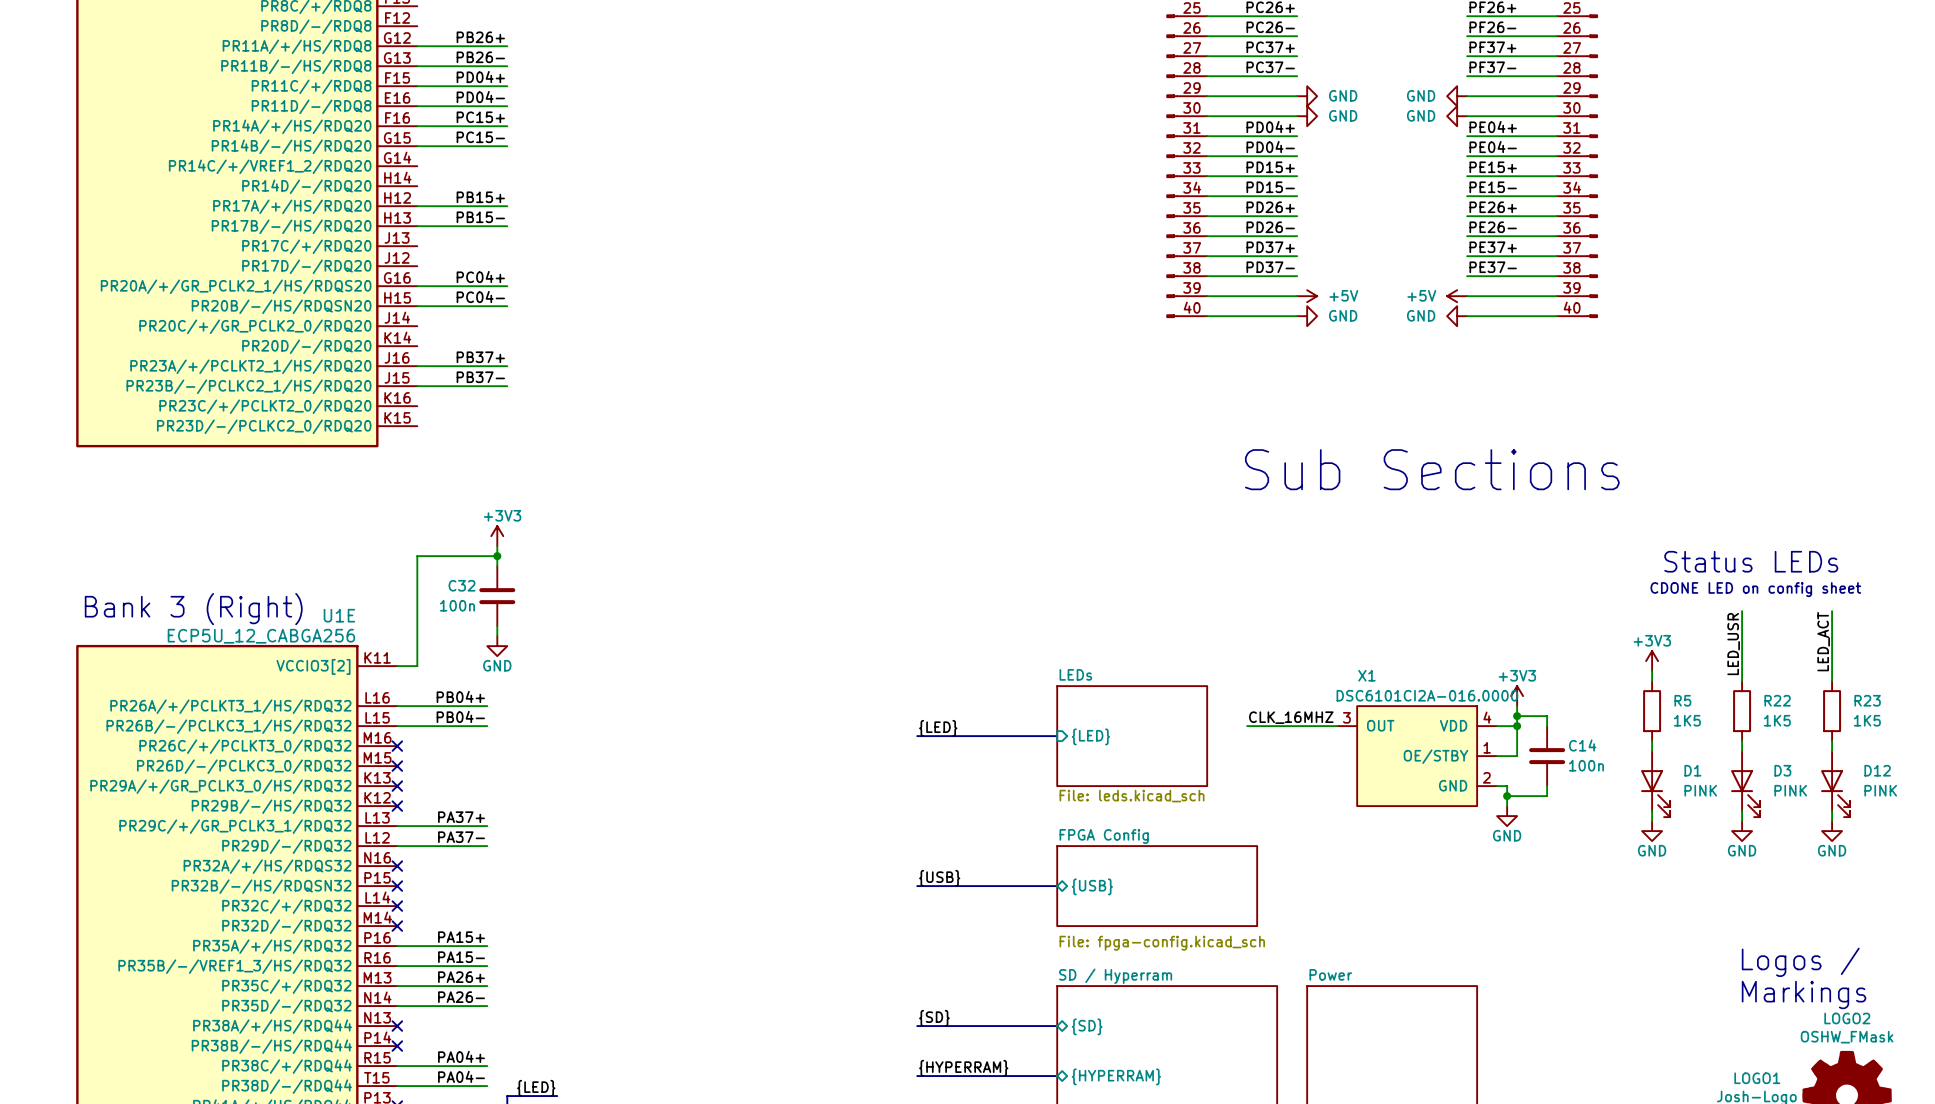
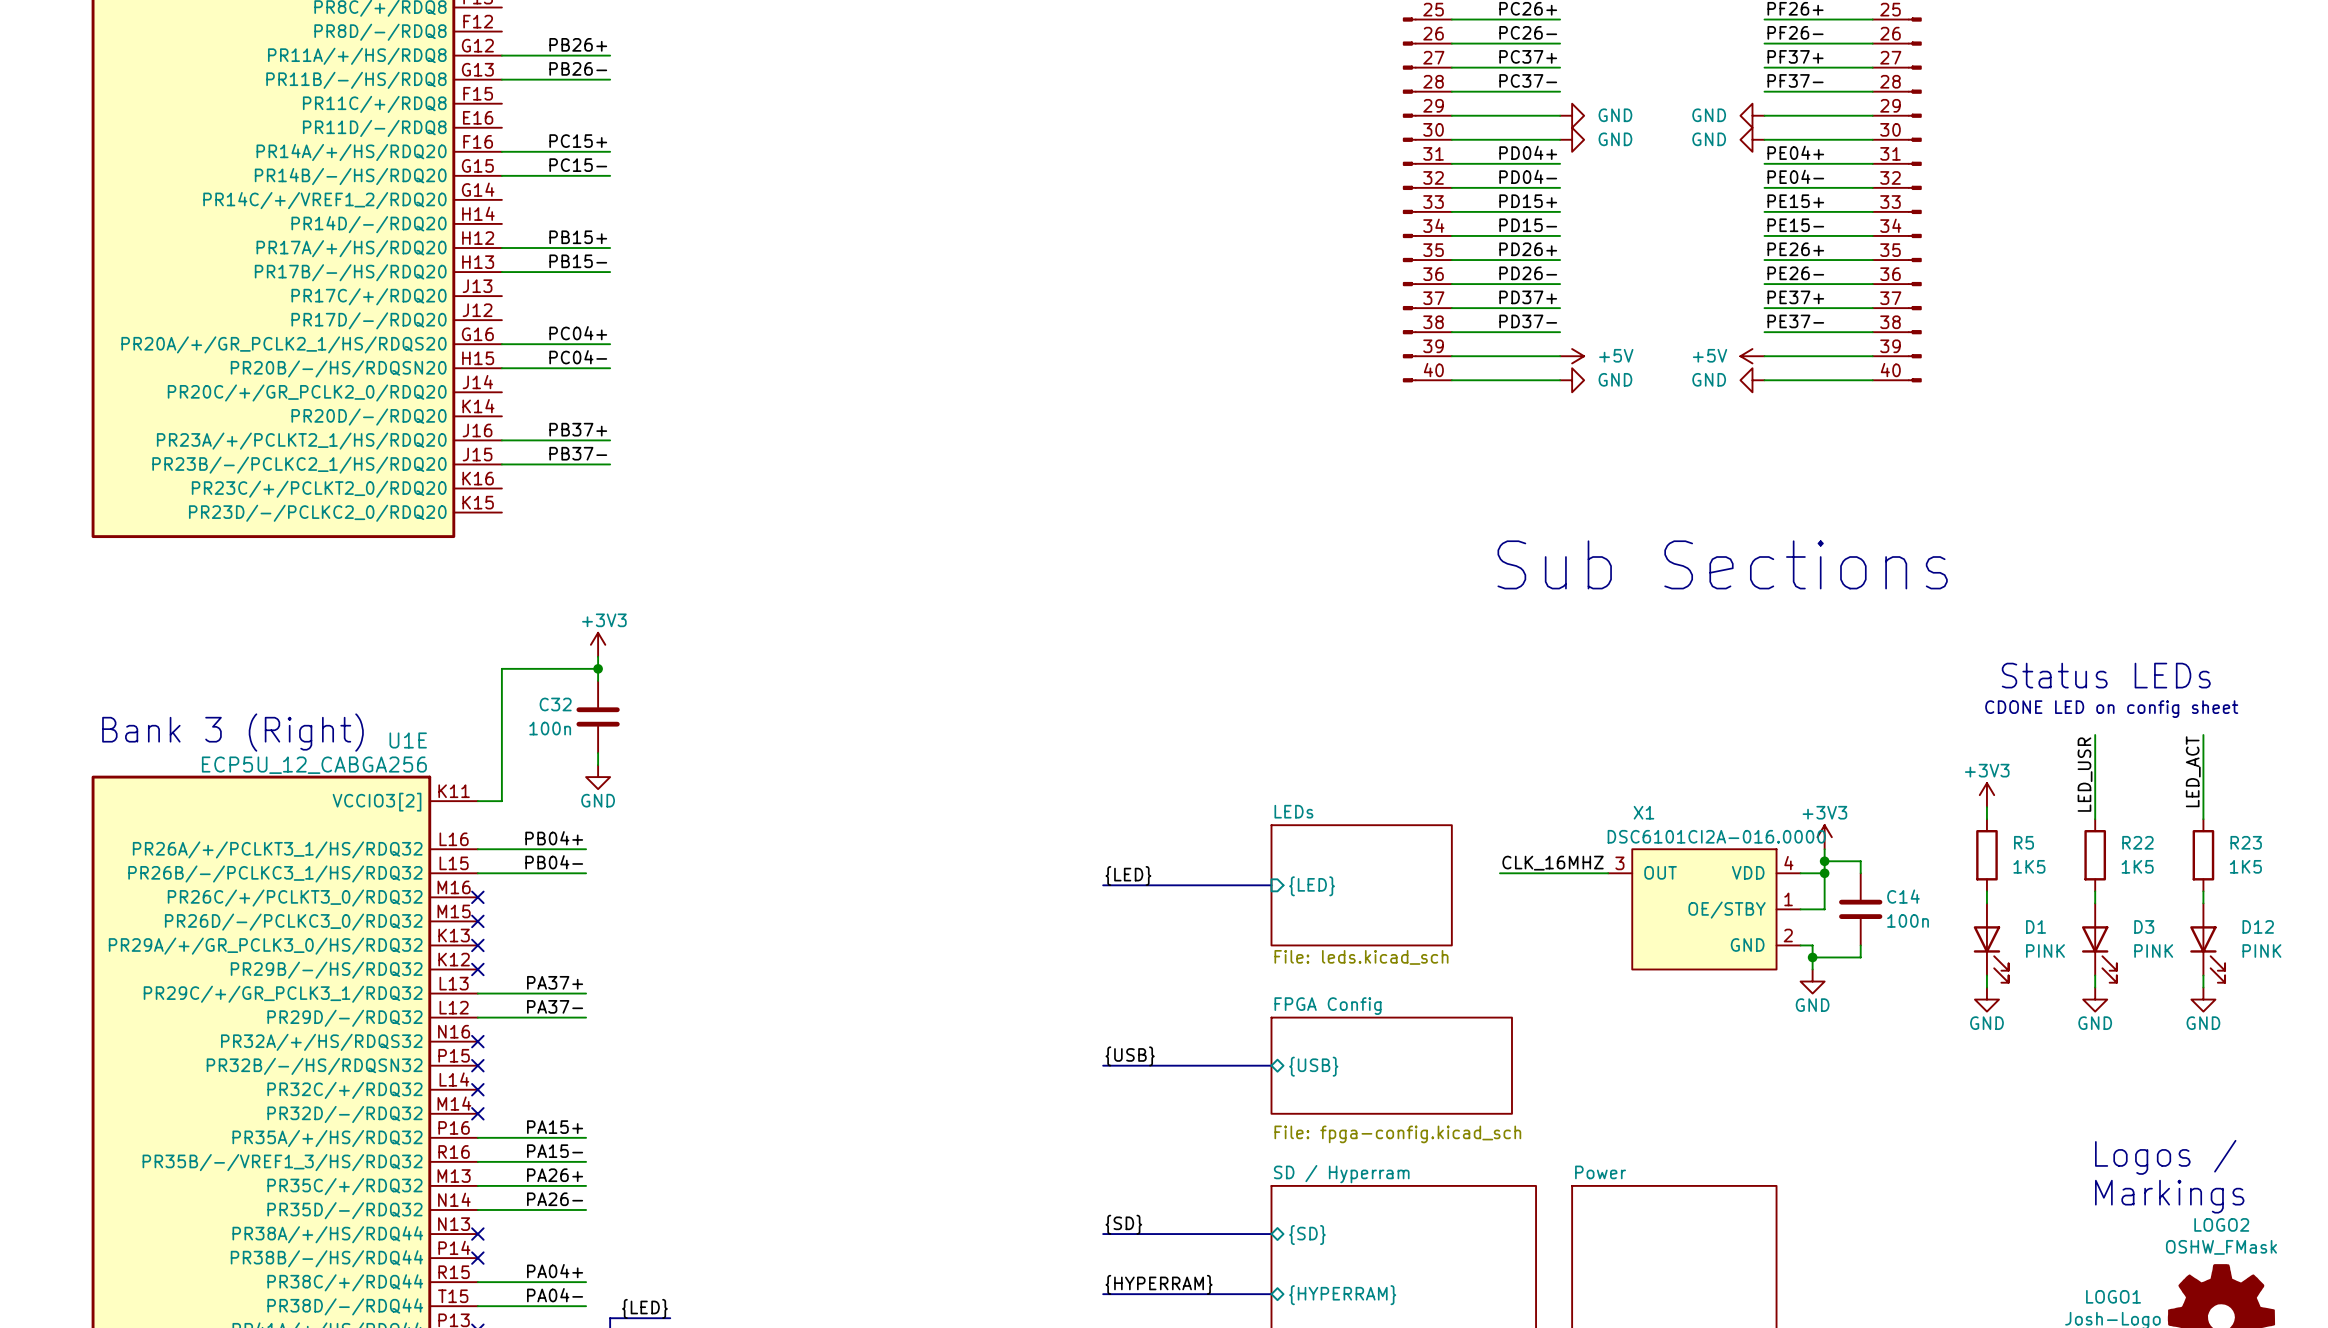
label: PD04+ (480, 77) -> none
wire: (417, 86) (507, 86) -> none
label: PD04- (480, 97) -> none
wire: (417, 106) (507, 106) -> none

